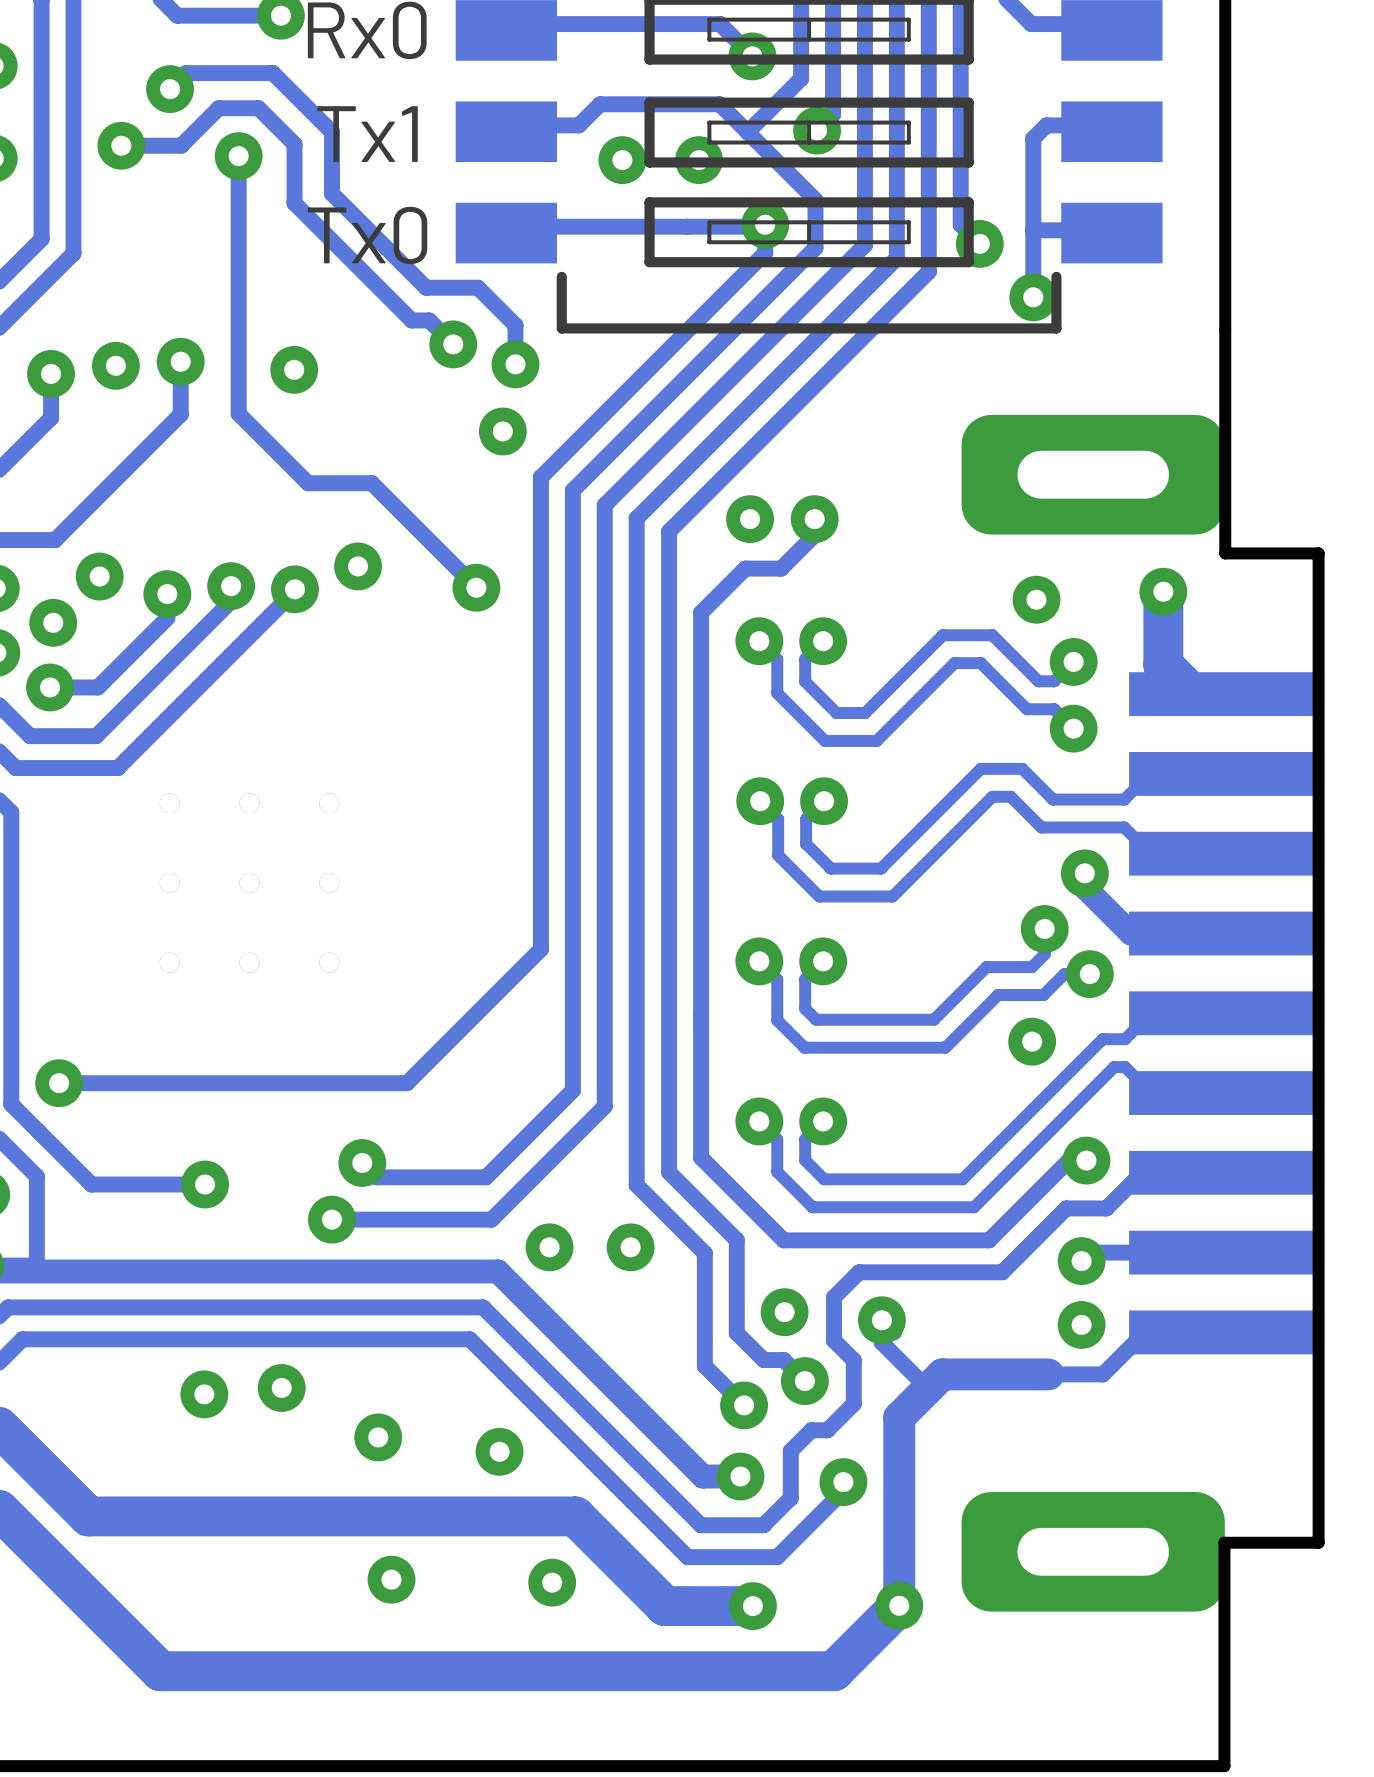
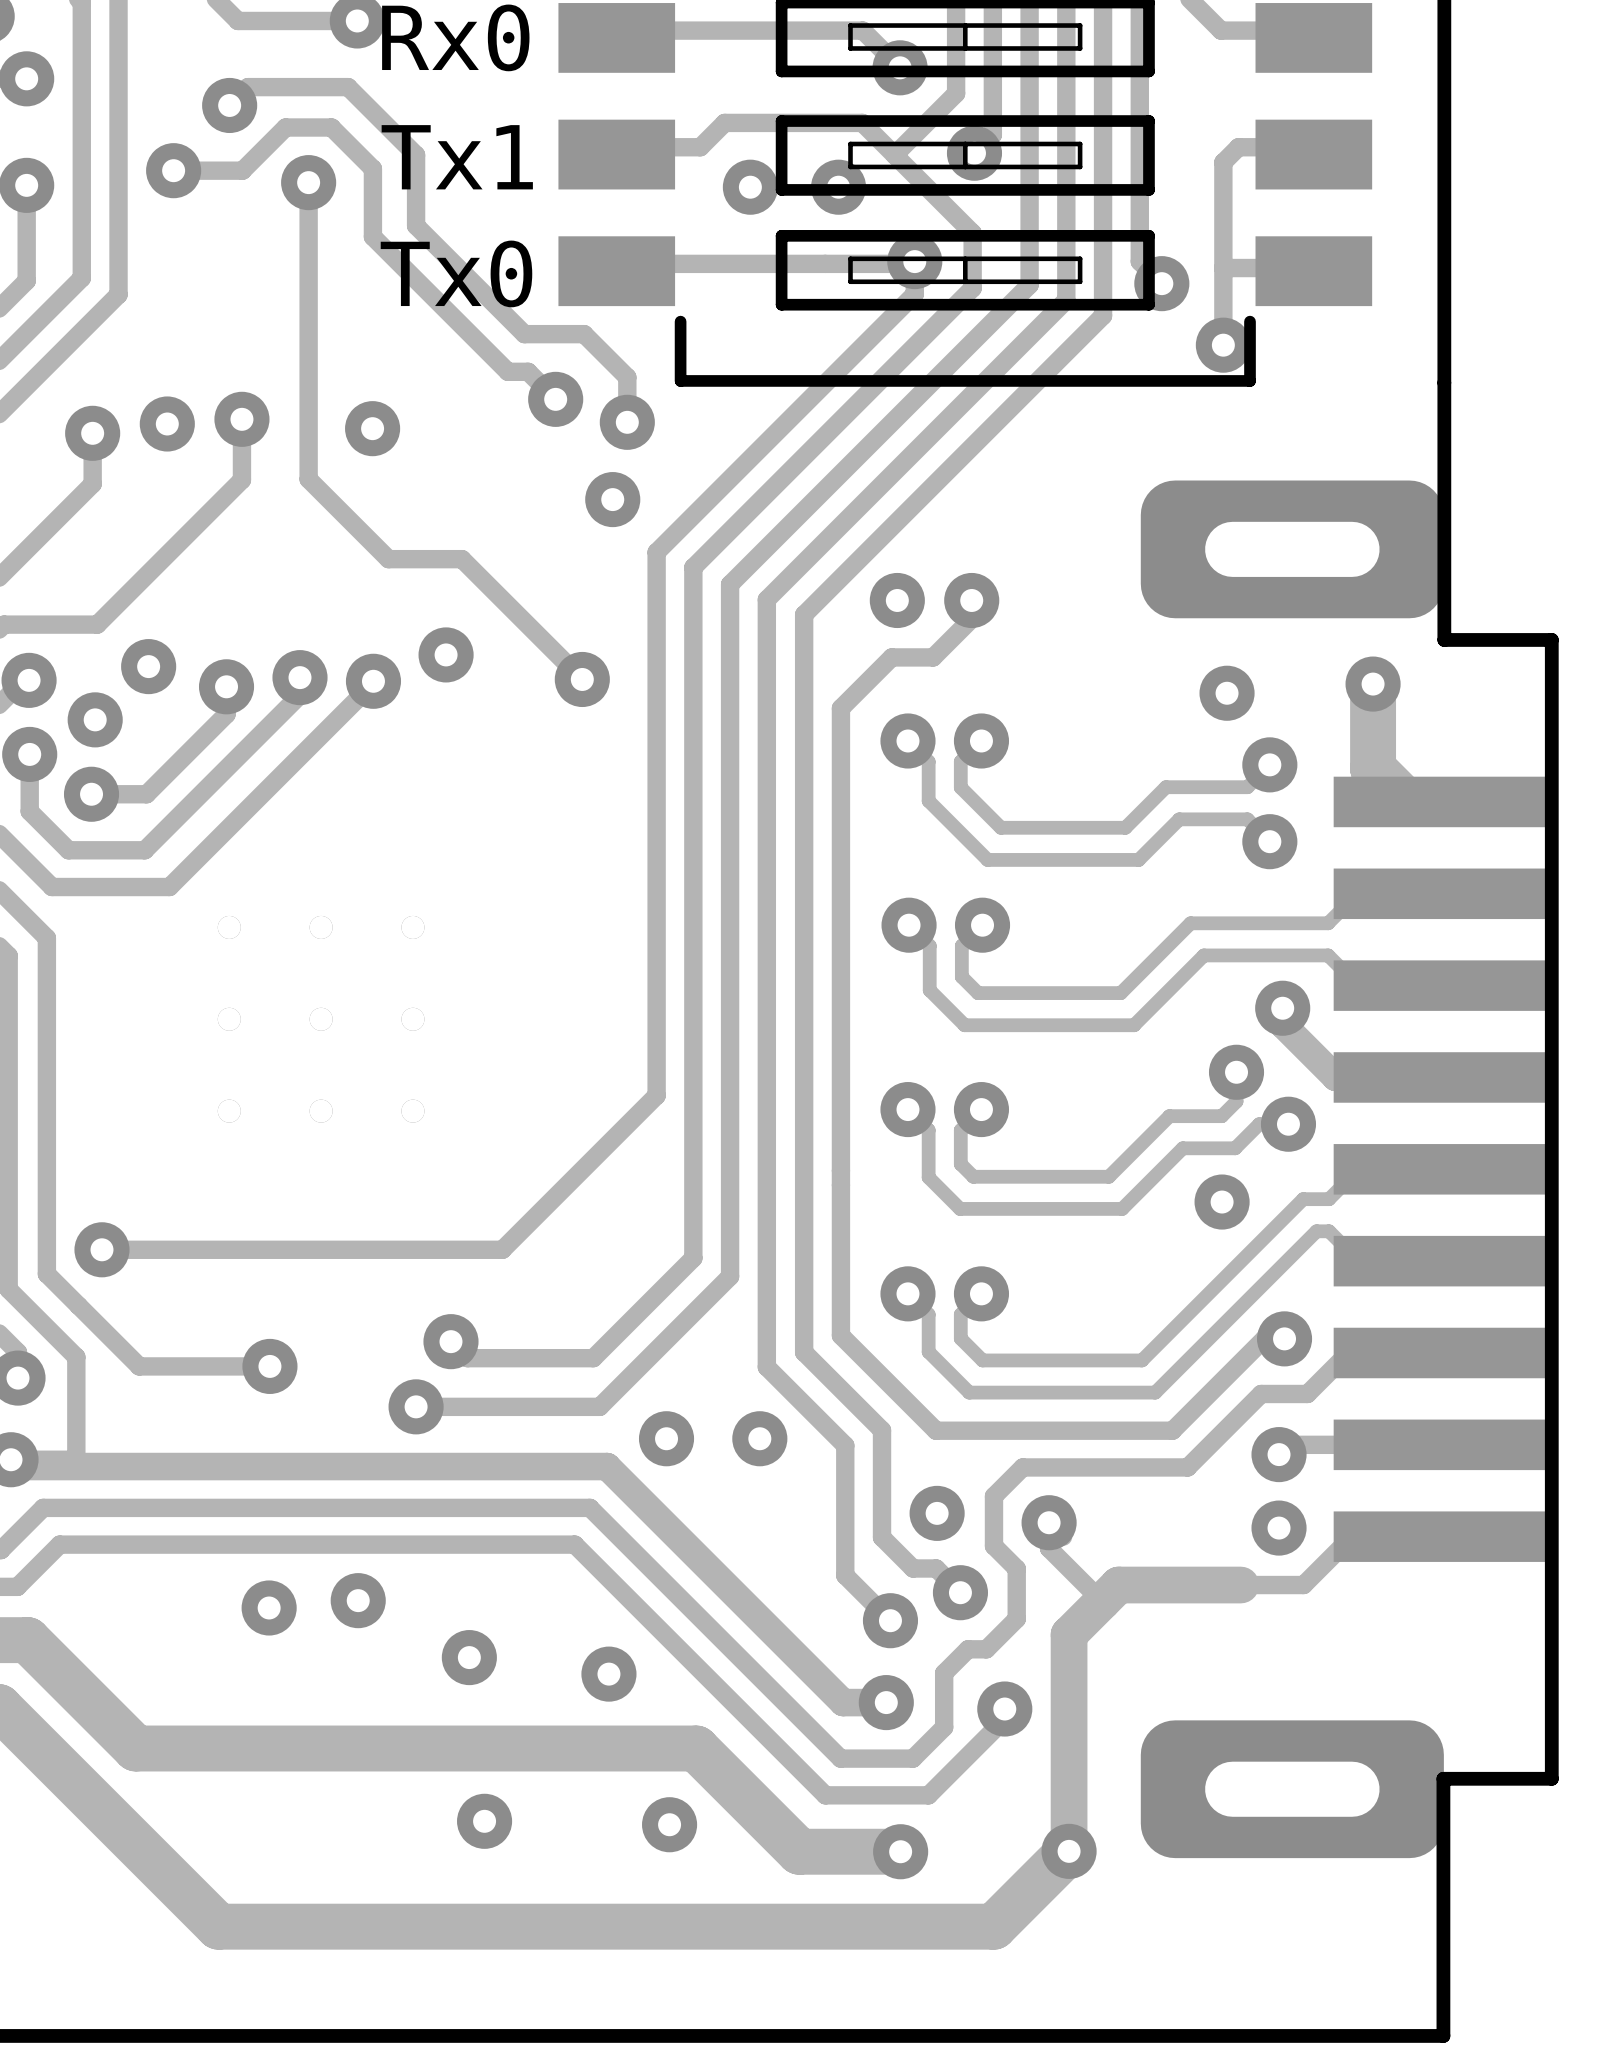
track: (1038, 681) (992, 635) (942, 635) (865, 713) (836, 713) -> (1229, 787) (1166, 787) (1125, 827) (1000, 827) (996, 823)
track: (1026, 709) (980, 663) (954, 663) (876, 740) (824, 740) -> (1216, 819) (1179, 819) (1138, 859) (987, 859) (983, 855)
track: (1053, 799) (1022, 768) (980, 768) (881, 868) (830, 868) (806, 843) -> (1246, 923) (1190, 923) (1120, 993) (978, 993) (961, 976) (961, 974)
track: (1041, 827) (1010, 796) (992, 796) (892, 896) (819, 896) (778, 855) -> (1232, 955) (1203, 955) (1134, 1025) (964, 1025) (929, 990) (929, 987)

